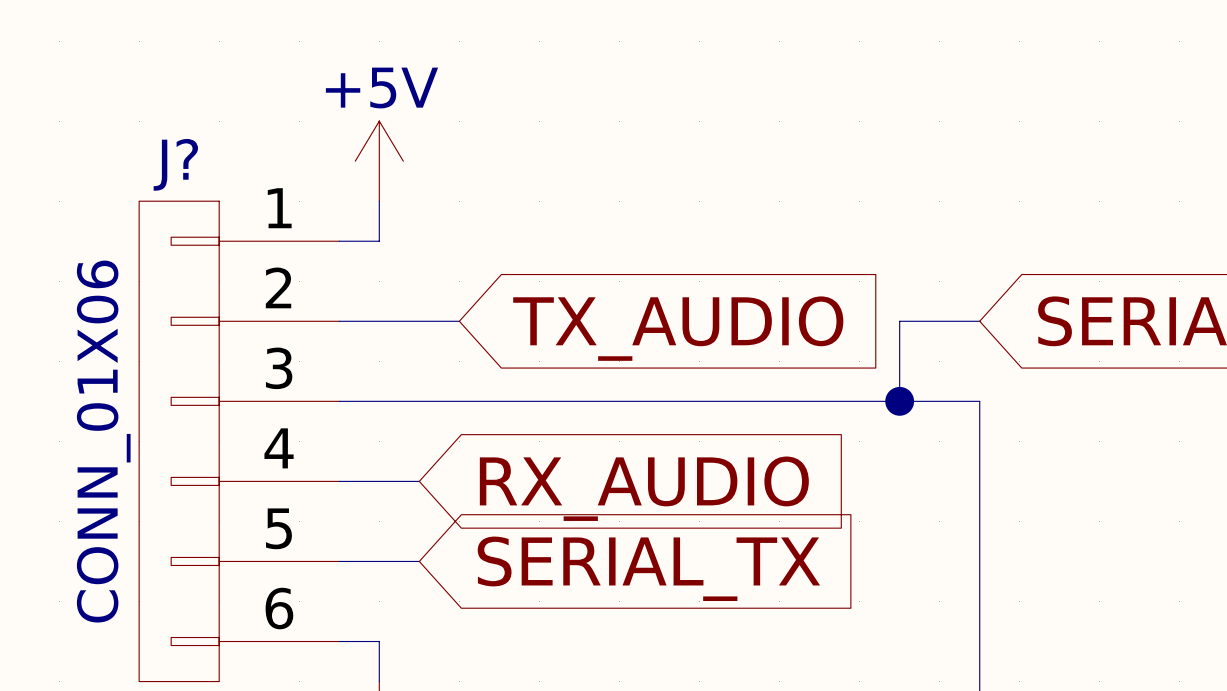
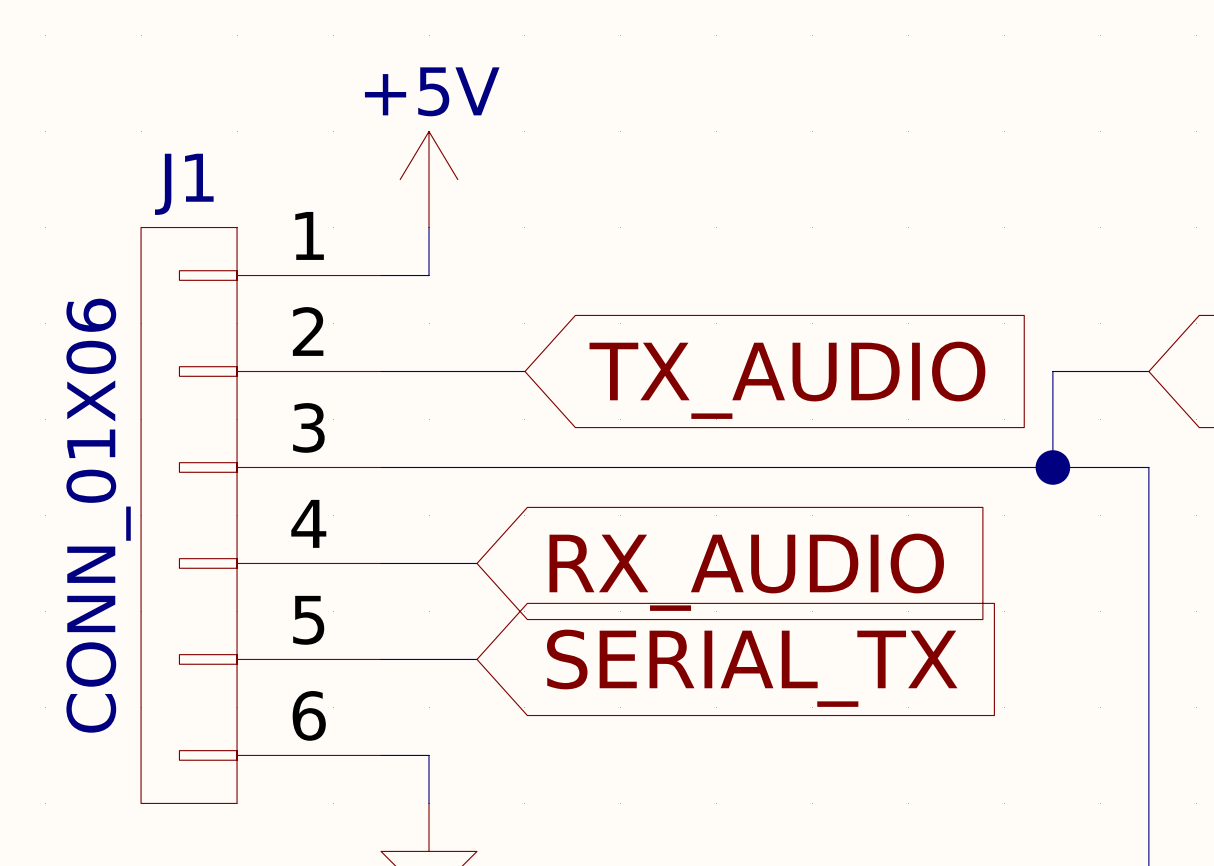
J? name: J? (175, 164) -> J1 (184, 184)

